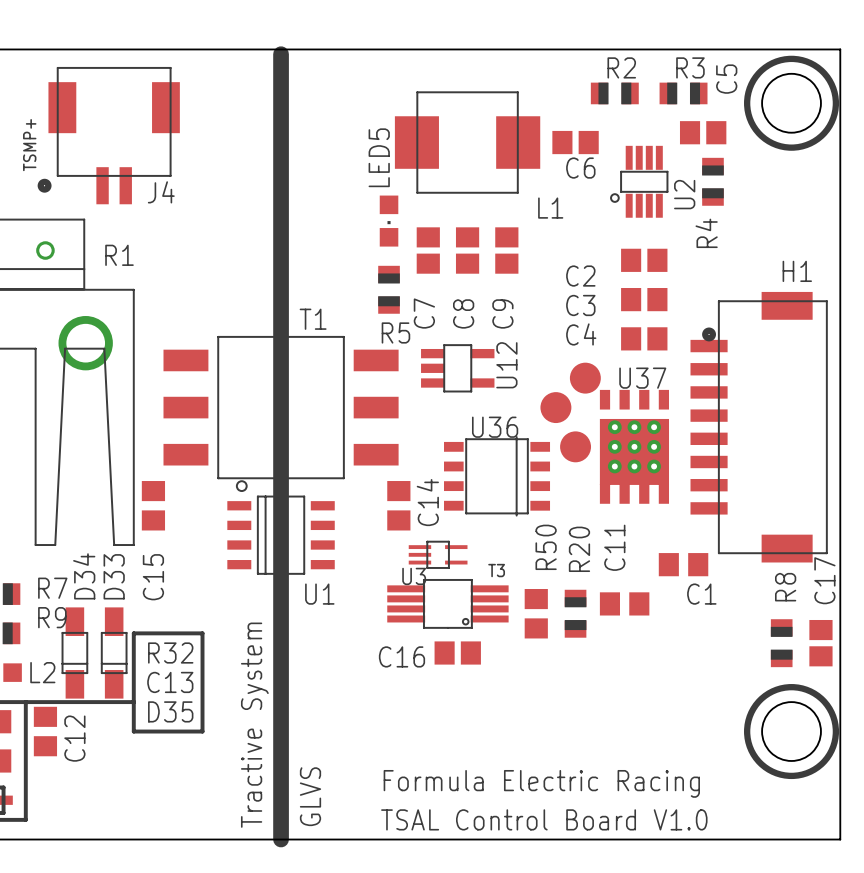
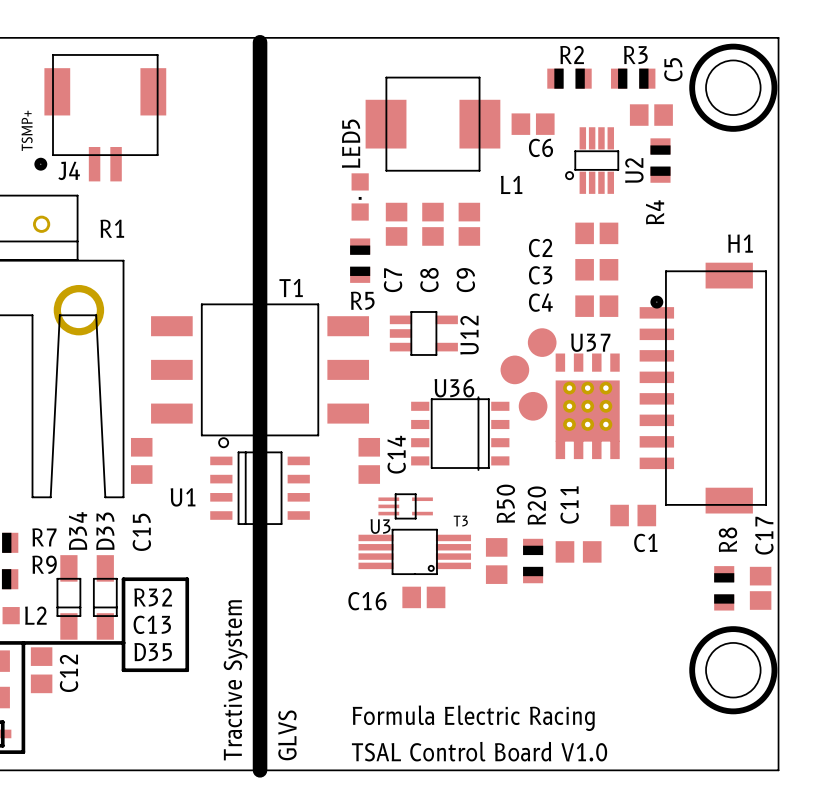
J4 name position: J4 (161, 192) -> J4 (69, 170)
U1 name position: U1 (319, 594) -> U1 (183, 497)

